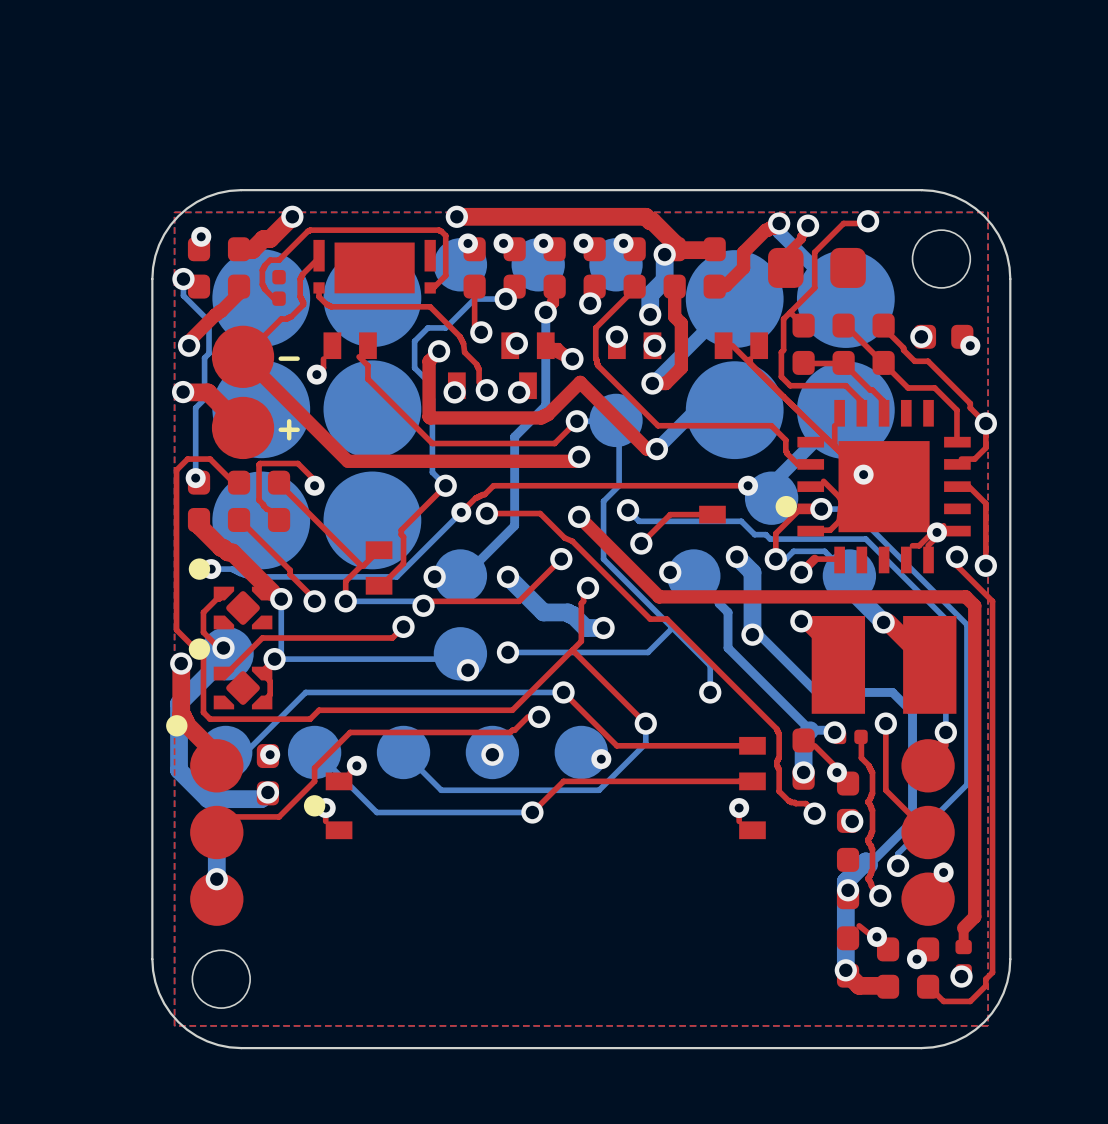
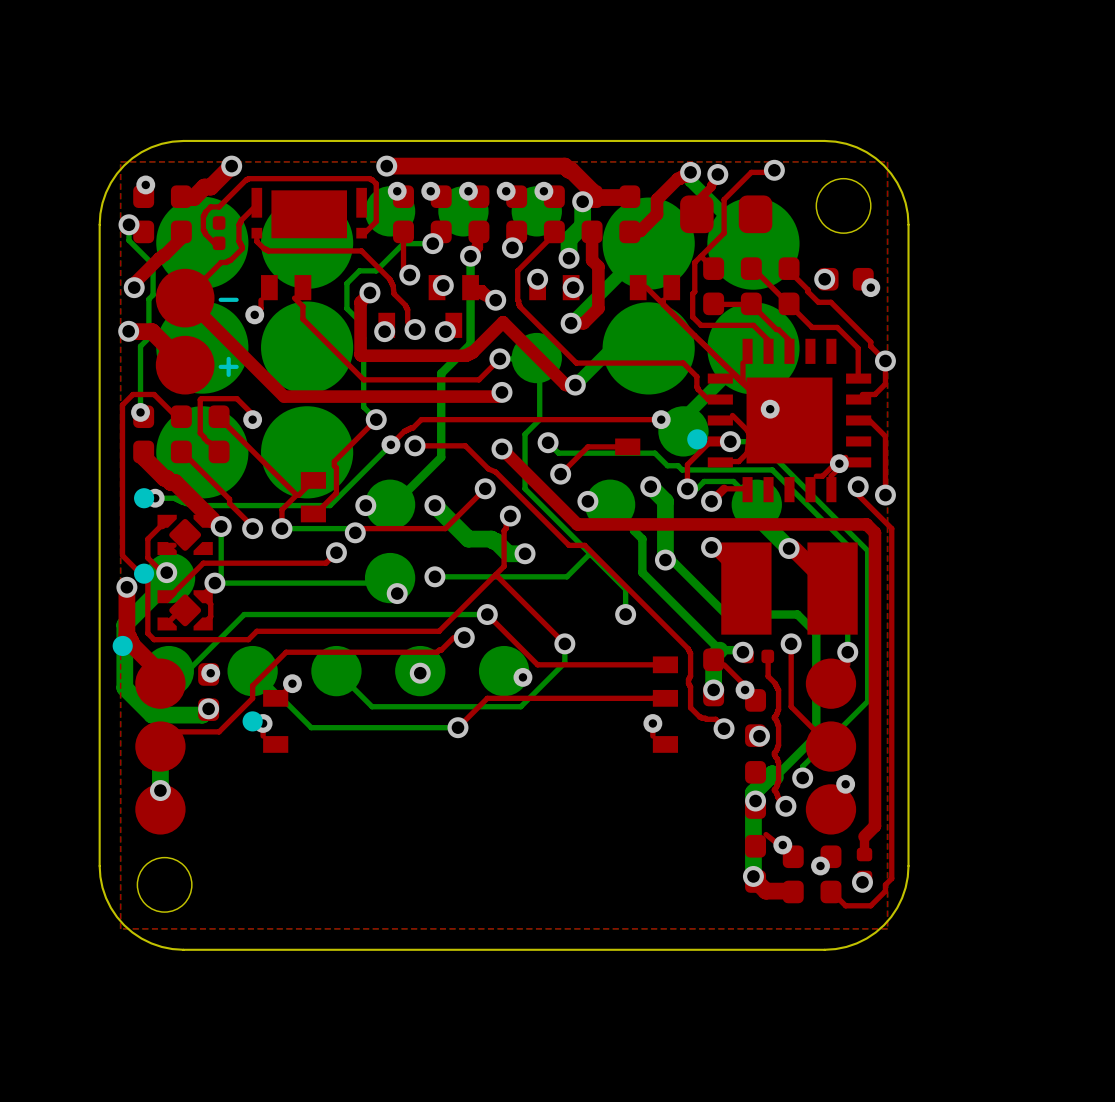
top track: none -> (169, 545) (174, 545)
top track: none -> (174, 616) (169, 620)

